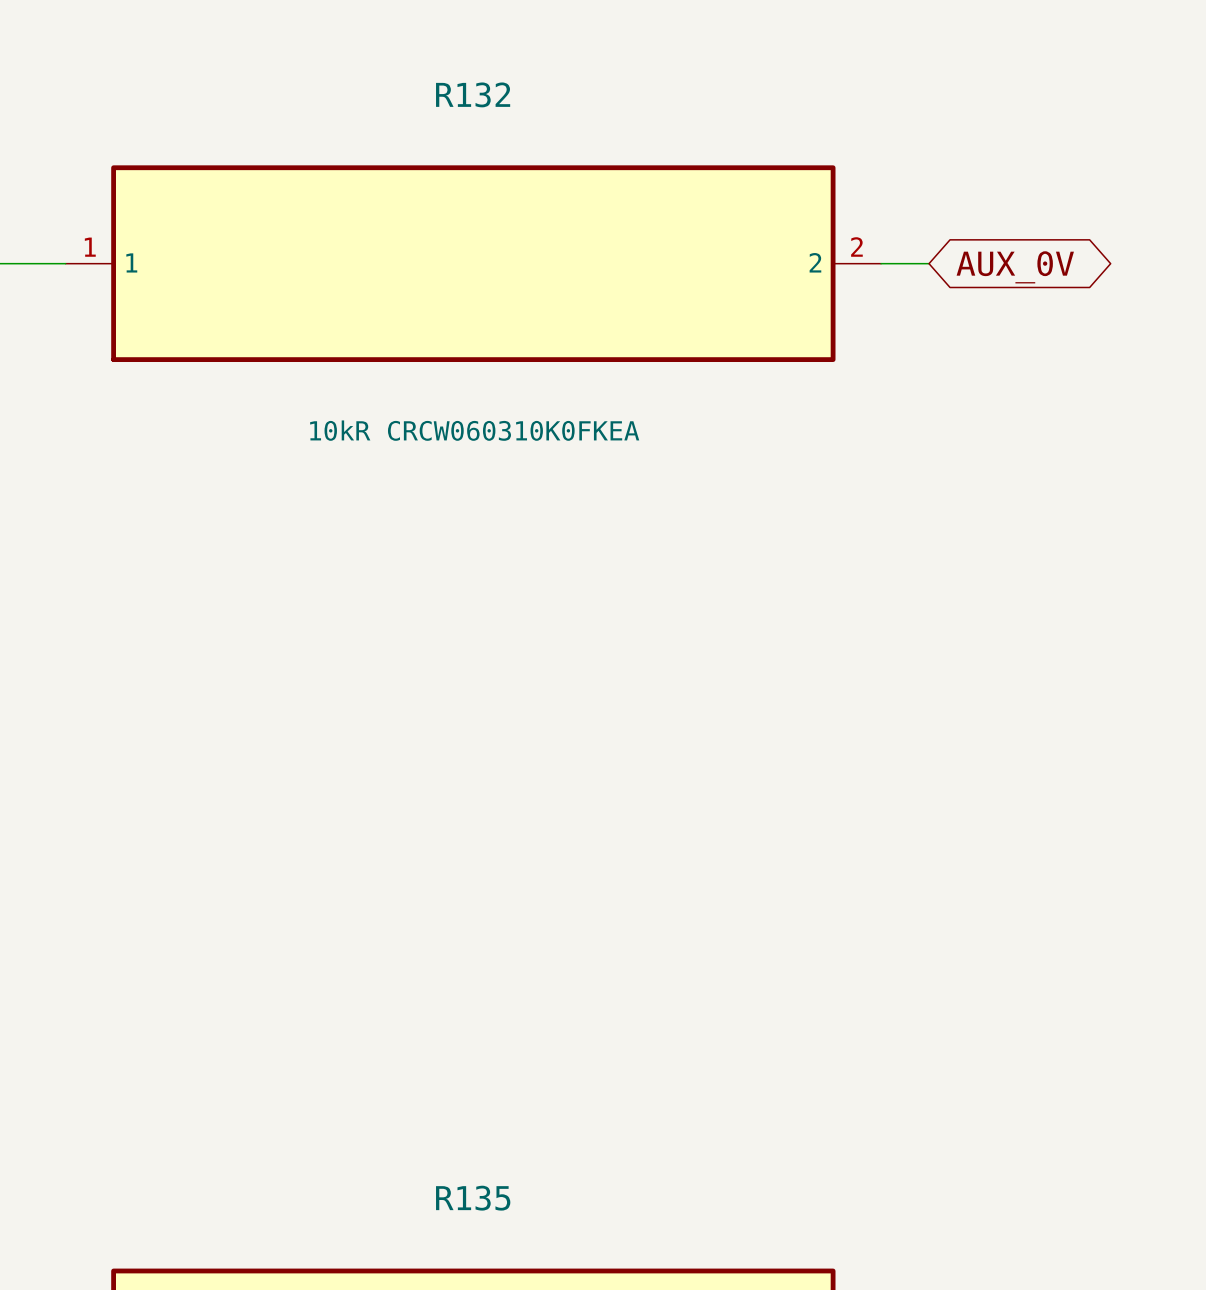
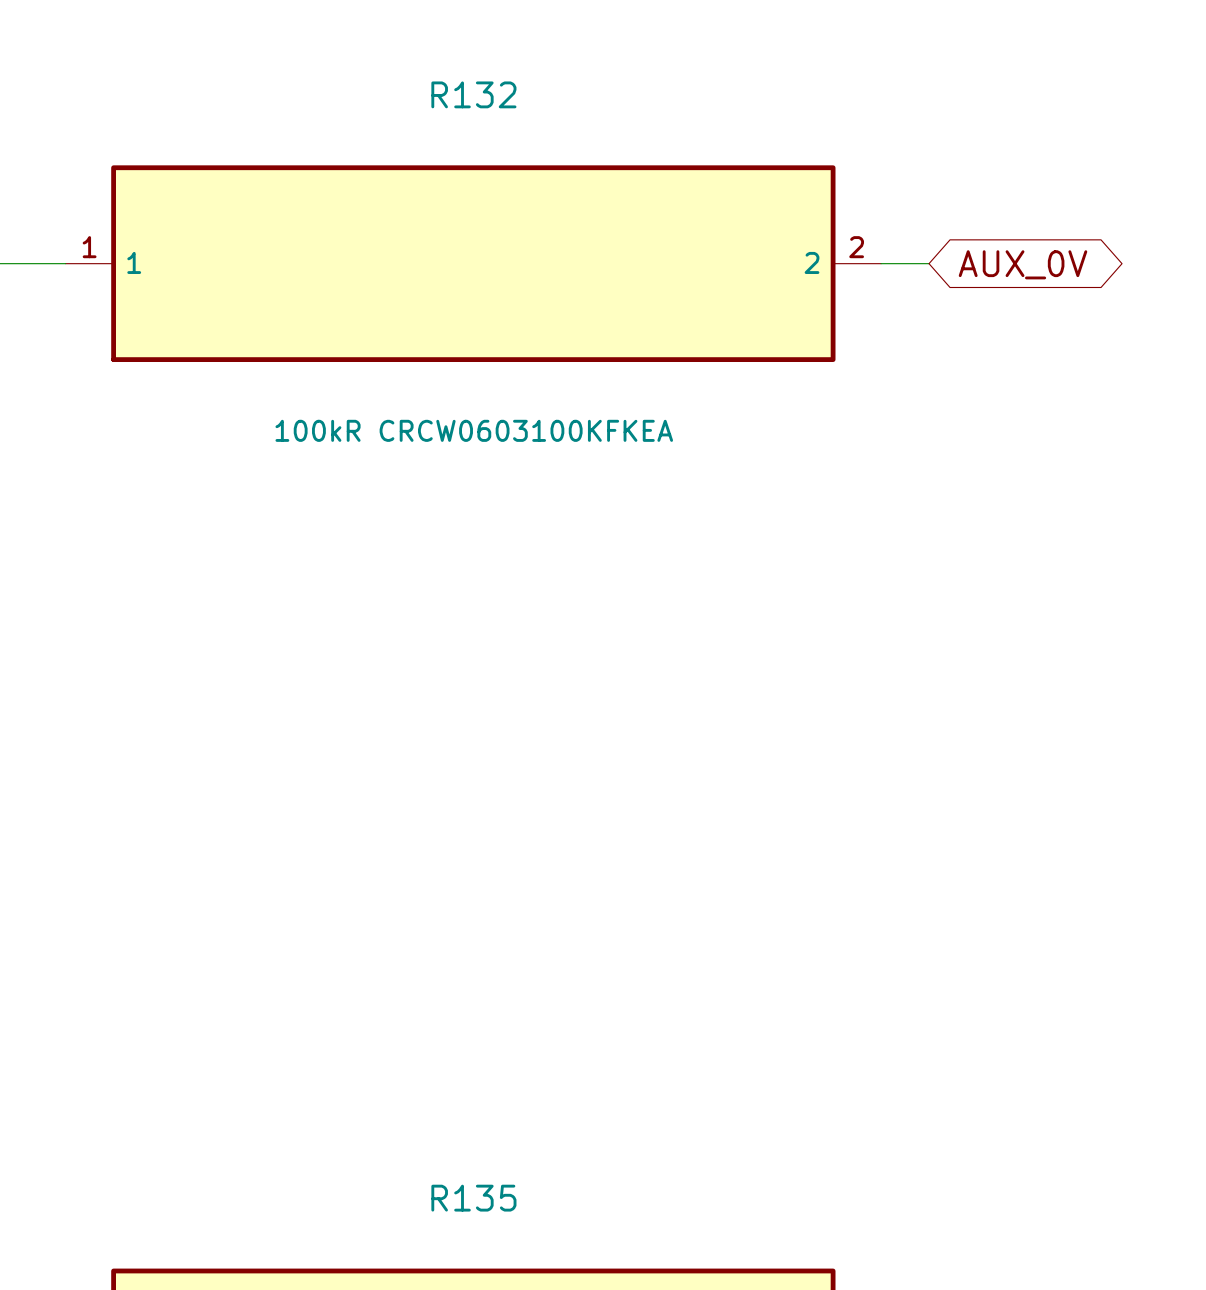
R132 value: 10kR CRCW060310K0FKEA (474, 430) -> 100kR CRCW0603100KFKEA (474, 430)

